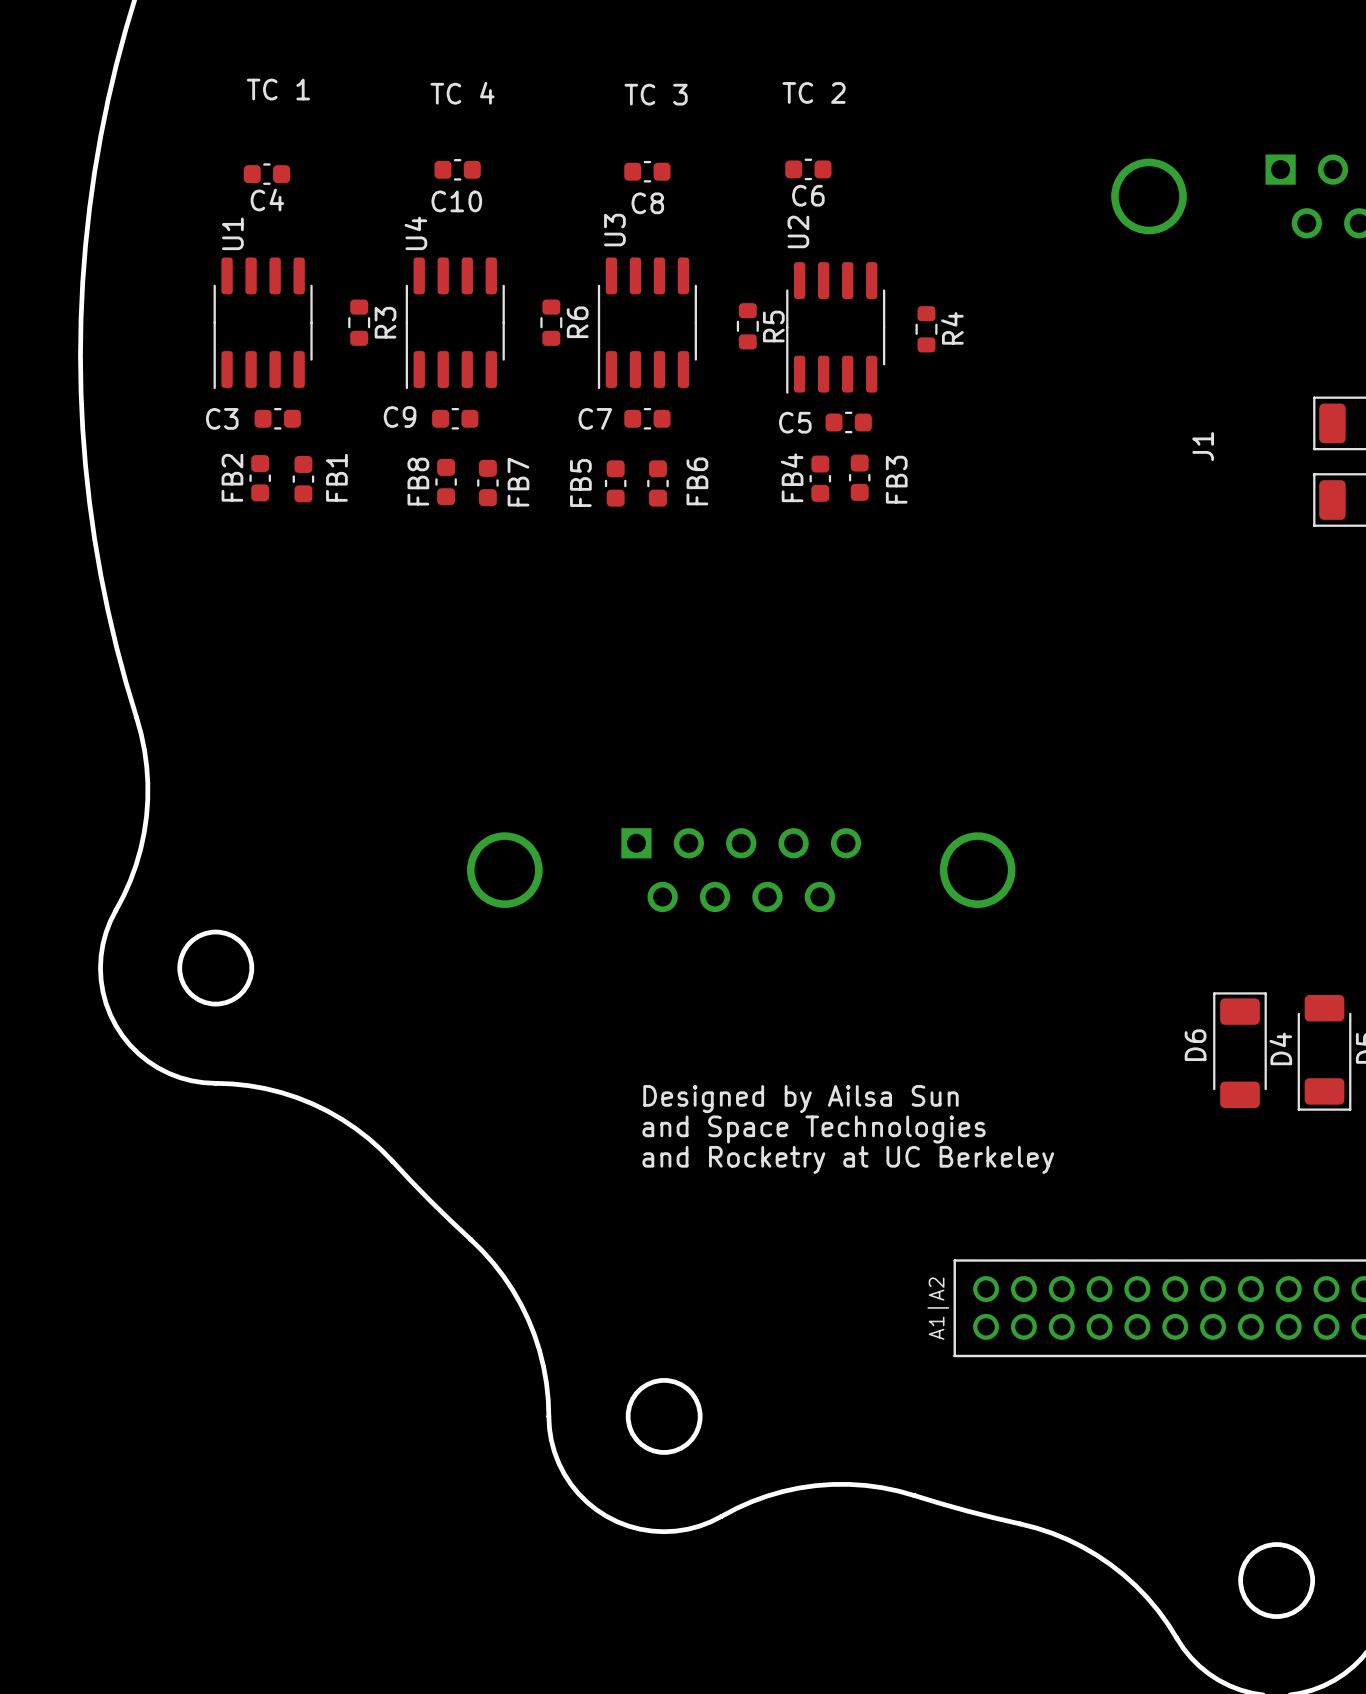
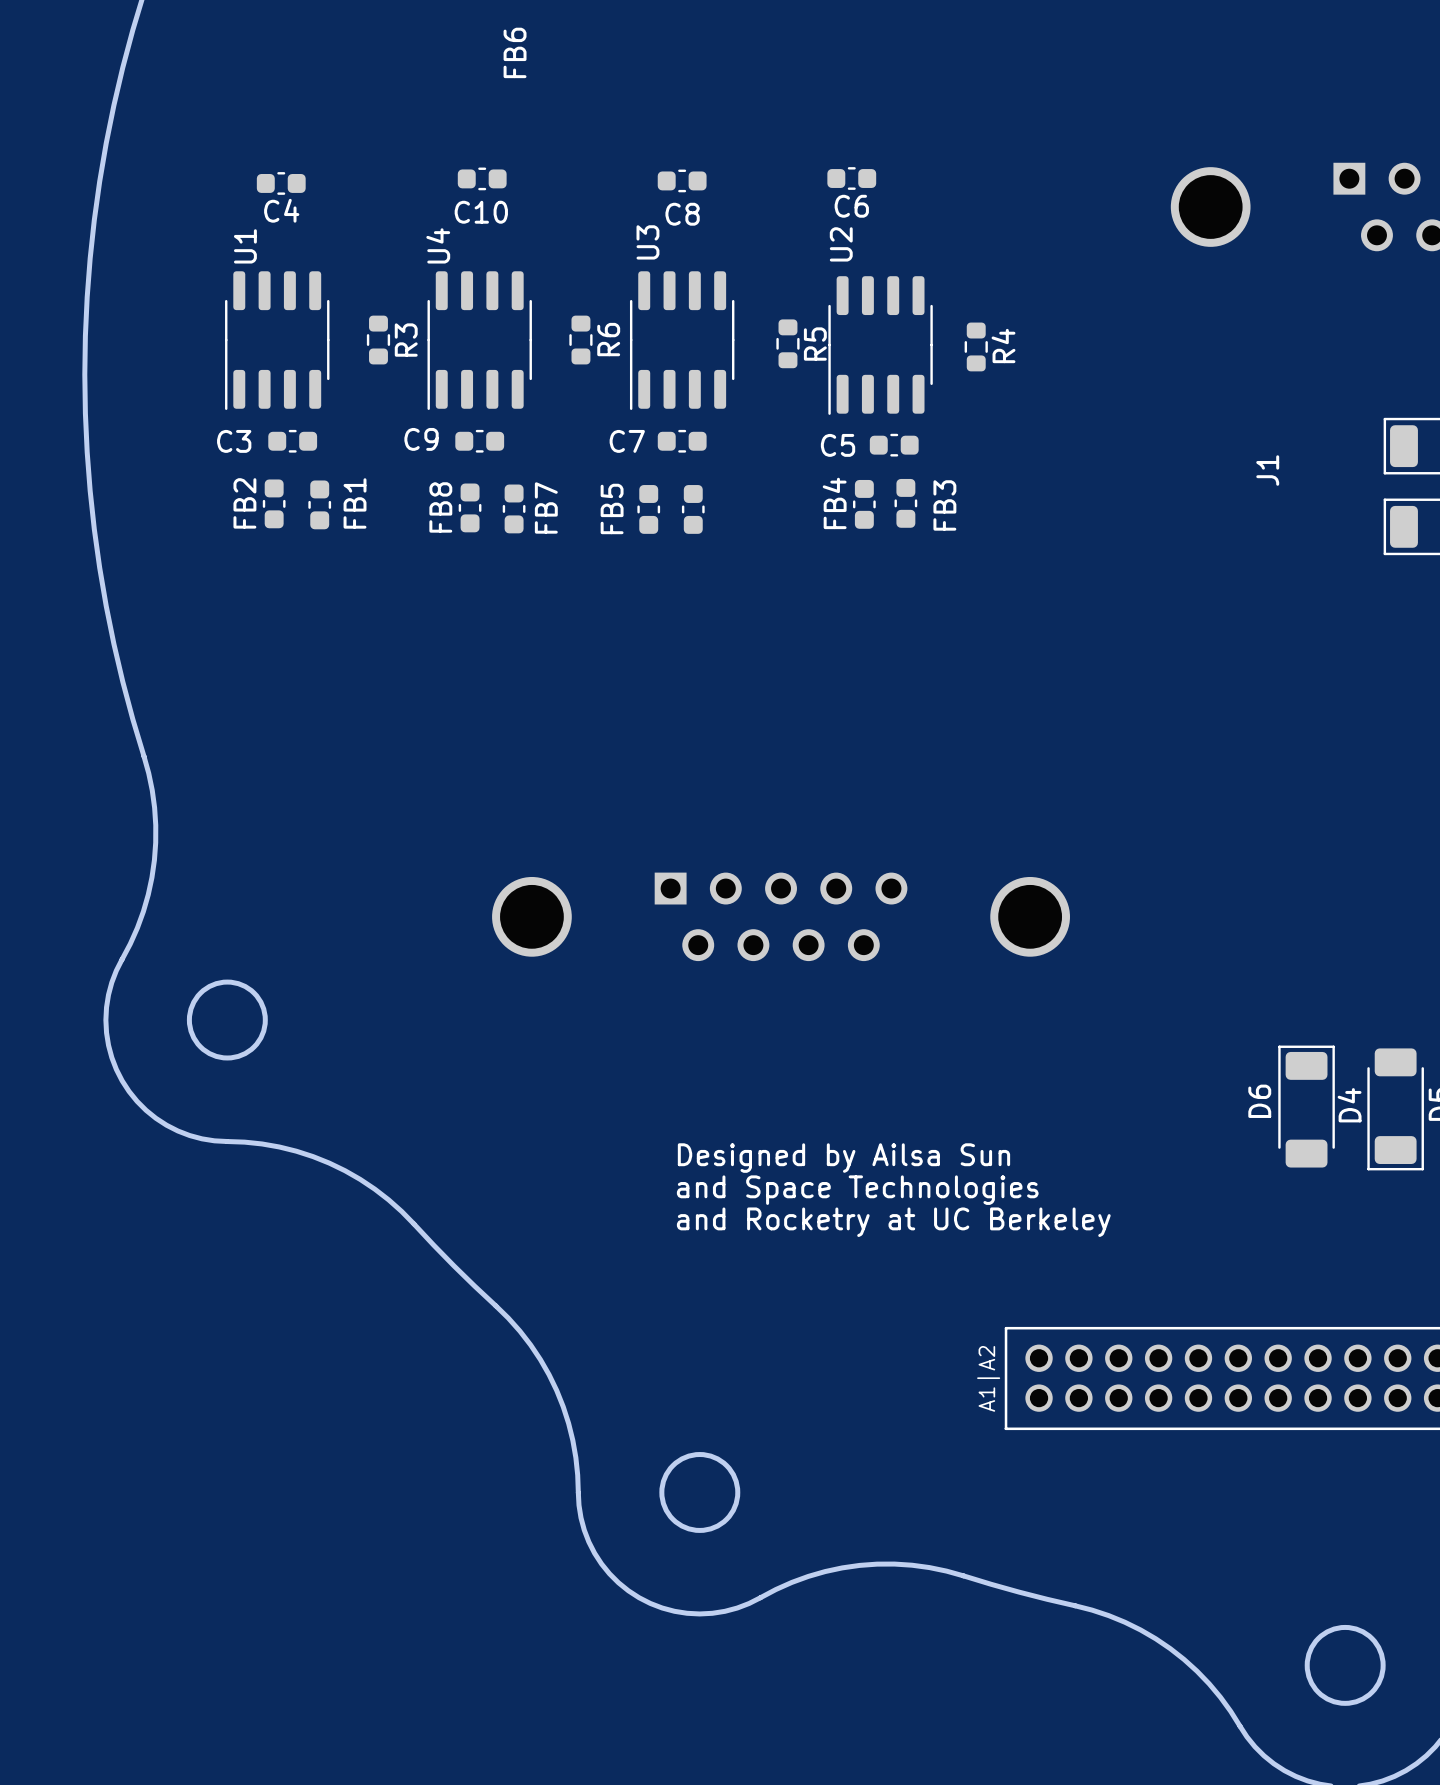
text: TC 1 (278, 89) -> none
text: TC 2 (814, 92) -> none
text: TC 4 (462, 93) -> none
text: TC 3 (656, 94) -> none
FB6 name position: FB6 (697, 481) -> FB6 (515, 52)

